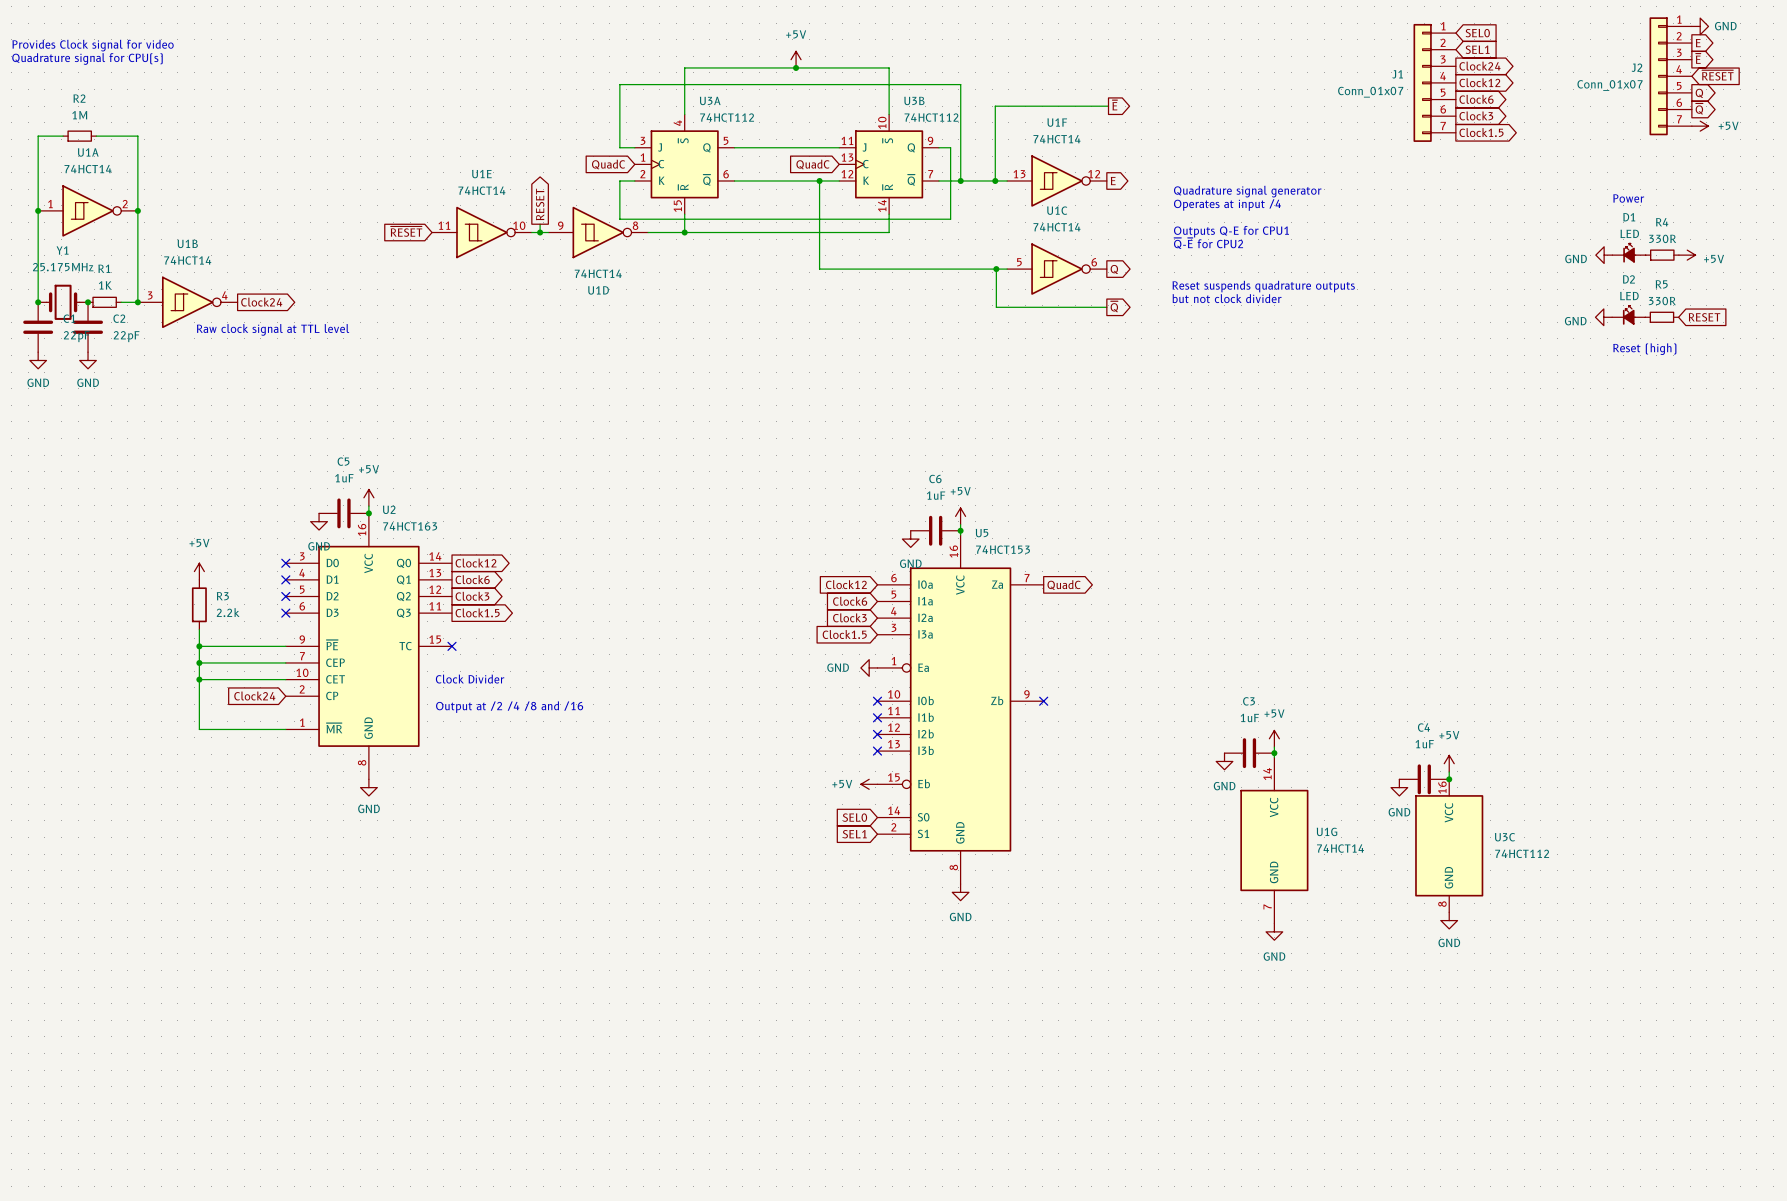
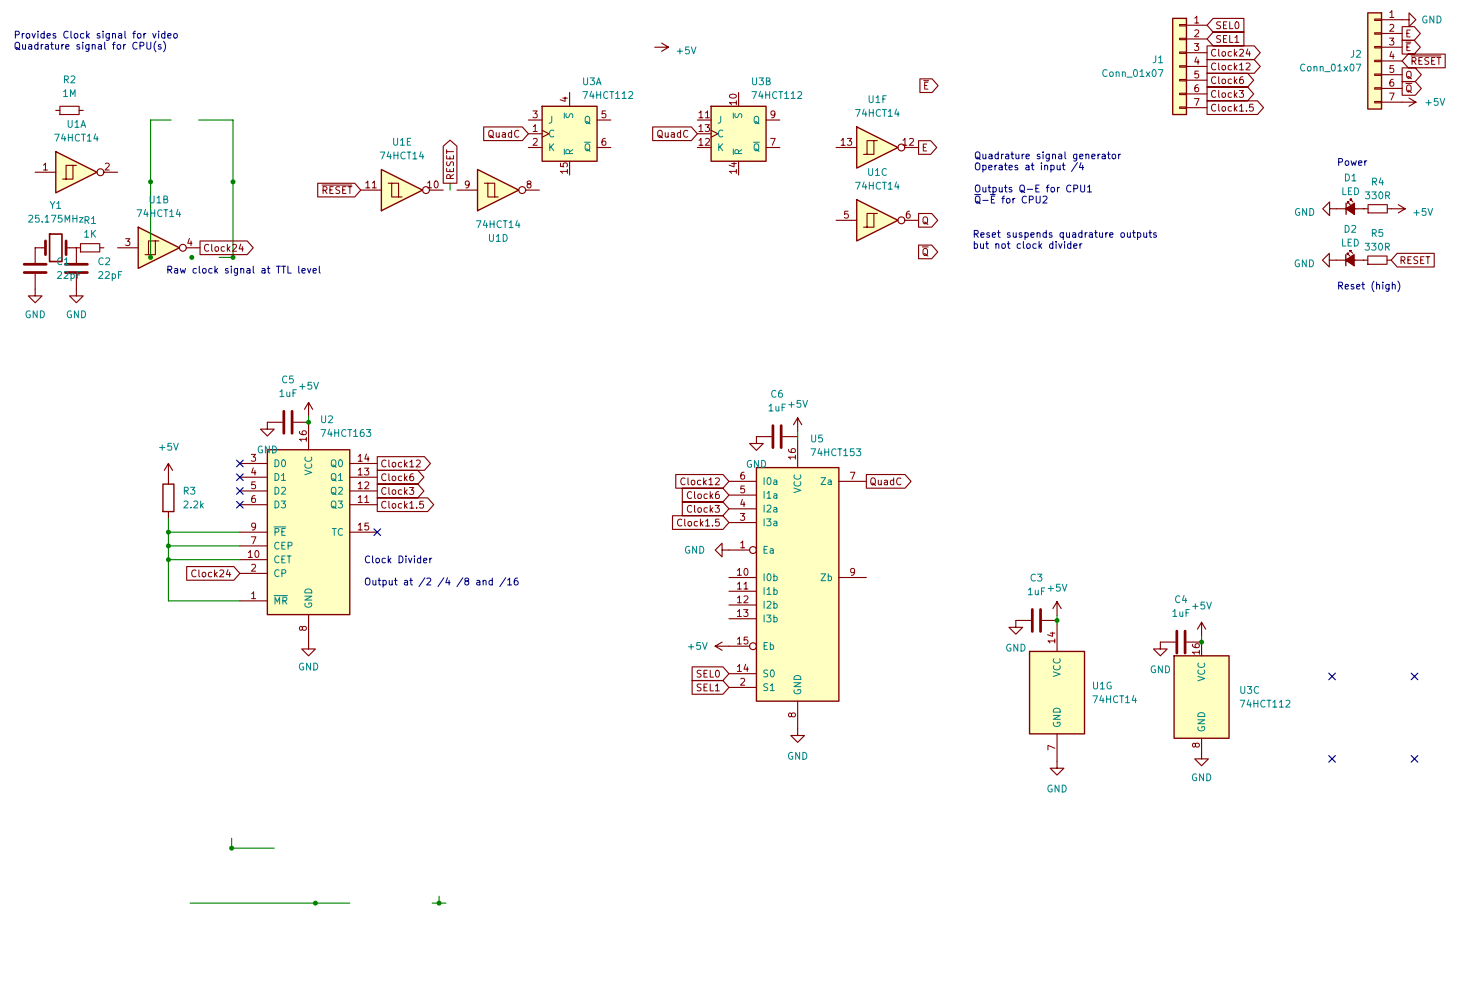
power symbol rotation: 0° (796, 59) -> 90° clockwise (661, 47)
junction: (796, 67) -> none
wire: (1108, 106) (995, 106) (995, 180) -> none
wire: (684, 114) (684, 67) (889, 67) (889, 114) -> none
wire: (63, 136) (38, 136) (38, 302) -> (171, 120) (150, 120) (150, 257)
wire: (96, 136) (137, 136) (137, 302) (121, 302) -> (198, 120) (233, 120) (233, 257) (219, 257)
wire: (634, 147) (619, 147) (619, 84) (960, 84) (960, 180) -> none
wire: (734, 147) (839, 147) -> none
wire: (938, 147) (950, 147) (950, 219) (619, 219) (619, 180) (634, 180) -> none
wire: (734, 180) (839, 180) -> none
wire: (819, 180) (819, 269) (1007, 269) -> none
junction: (819, 180) -> none
wire: (938, 180) (1007, 180) -> none
junction: (960, 180) -> none
junction: (995, 180) -> none
junction: (38, 210) -> none
junction: (137, 210) -> none
wire: (684, 214) (684, 232) -> none
wire: (889, 214) (889, 232) (648, 232) -> none
junction: none -> (150, 181)
junction: none -> (233, 181)
wire: (531, 232) (548, 232) -> none
junction: (540, 232) -> none
junction: (684, 232) -> none
wire: (996, 269) (996, 307) (1106, 307) -> none
junction: (996, 269) -> none
junction: (38, 302) -> none
junction: (88, 302) -> none
junction: (137, 302) -> none
junction: none -> (150, 257)
junction: none -> (191, 257)
junction: none -> (233, 257)
junction: (960, 530) -> none
no-connect mark: (877, 701) -> none
no-connect mark: (1043, 701) -> none
no-connect mark: (877, 717) -> none
no-connect mark: (877, 734) -> none
no-connect mark: (877, 751) -> none
no-connect mark: none -> (1332, 676)
no-connect mark: none -> (1414, 676)
no-connect mark: none -> (1332, 758)
no-connect mark: none -> (1414, 758)
wire: none -> (231, 838) (231, 848)
wire: none -> (231, 848) (274, 848)
junction: none -> (231, 848)
wire: none -> (439, 896) (439, 903)
wire: none -> (190, 903) (349, 903)
junction: none -> (315, 903)
wire: none -> (432, 903) (445, 903)
junction: none -> (439, 903)

